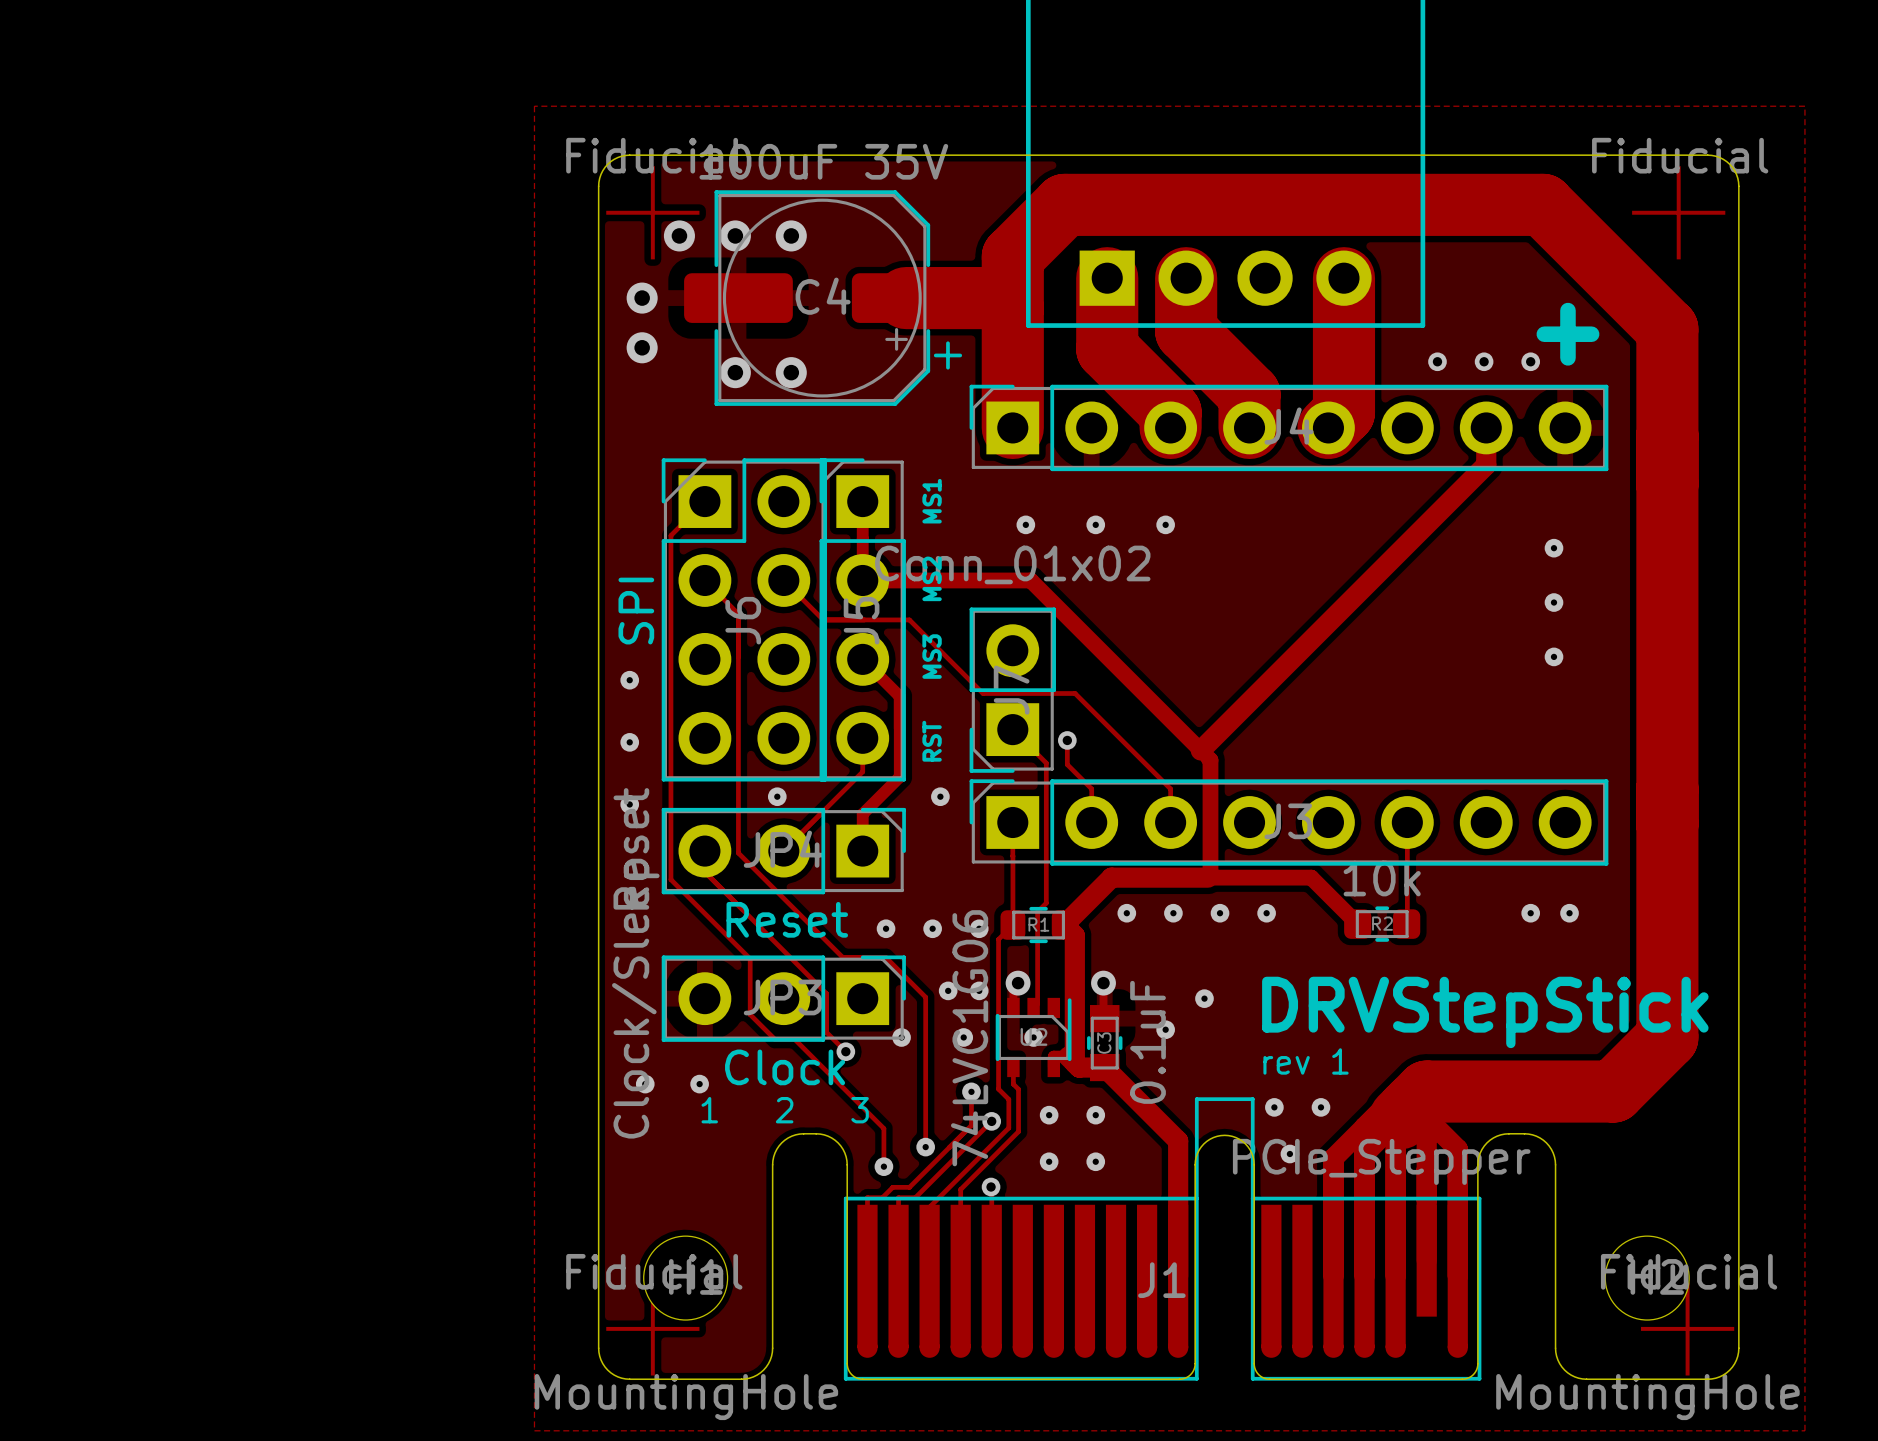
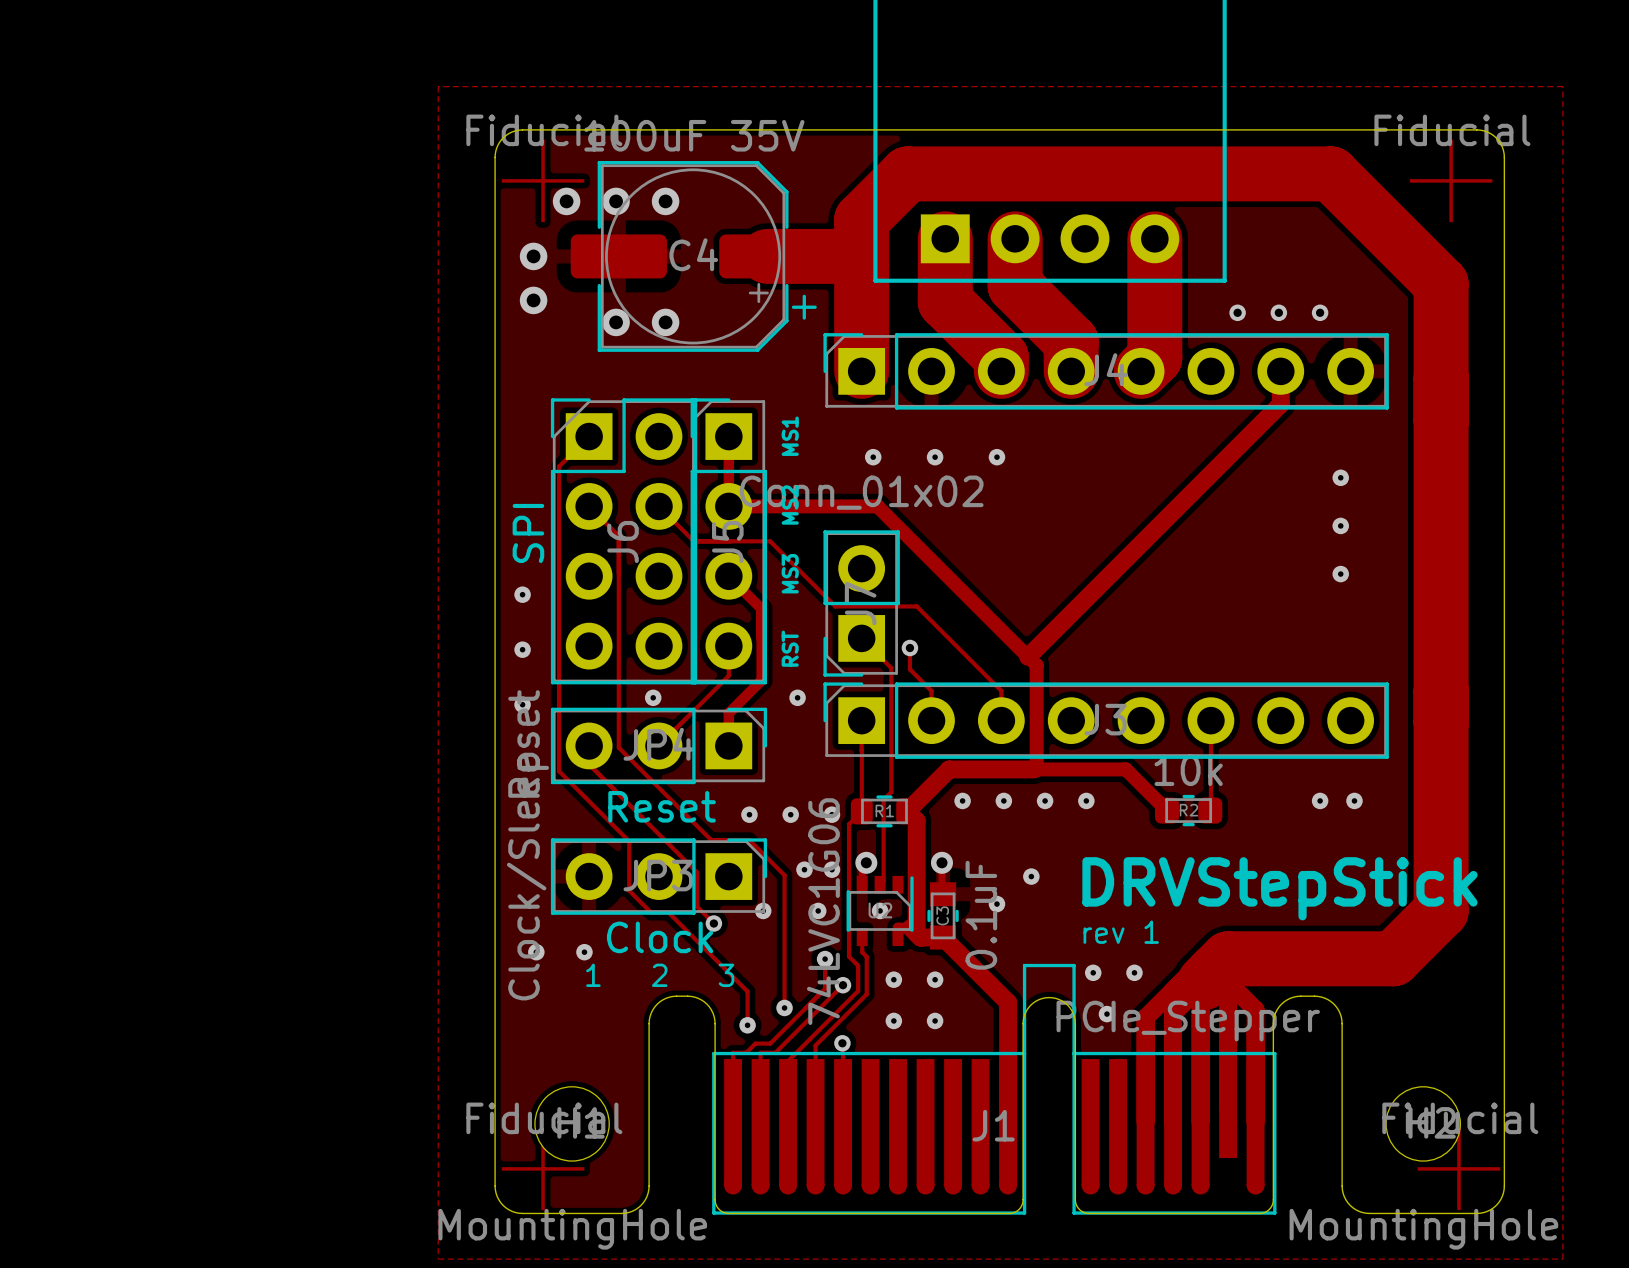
text: + (1567, 334) -> none

